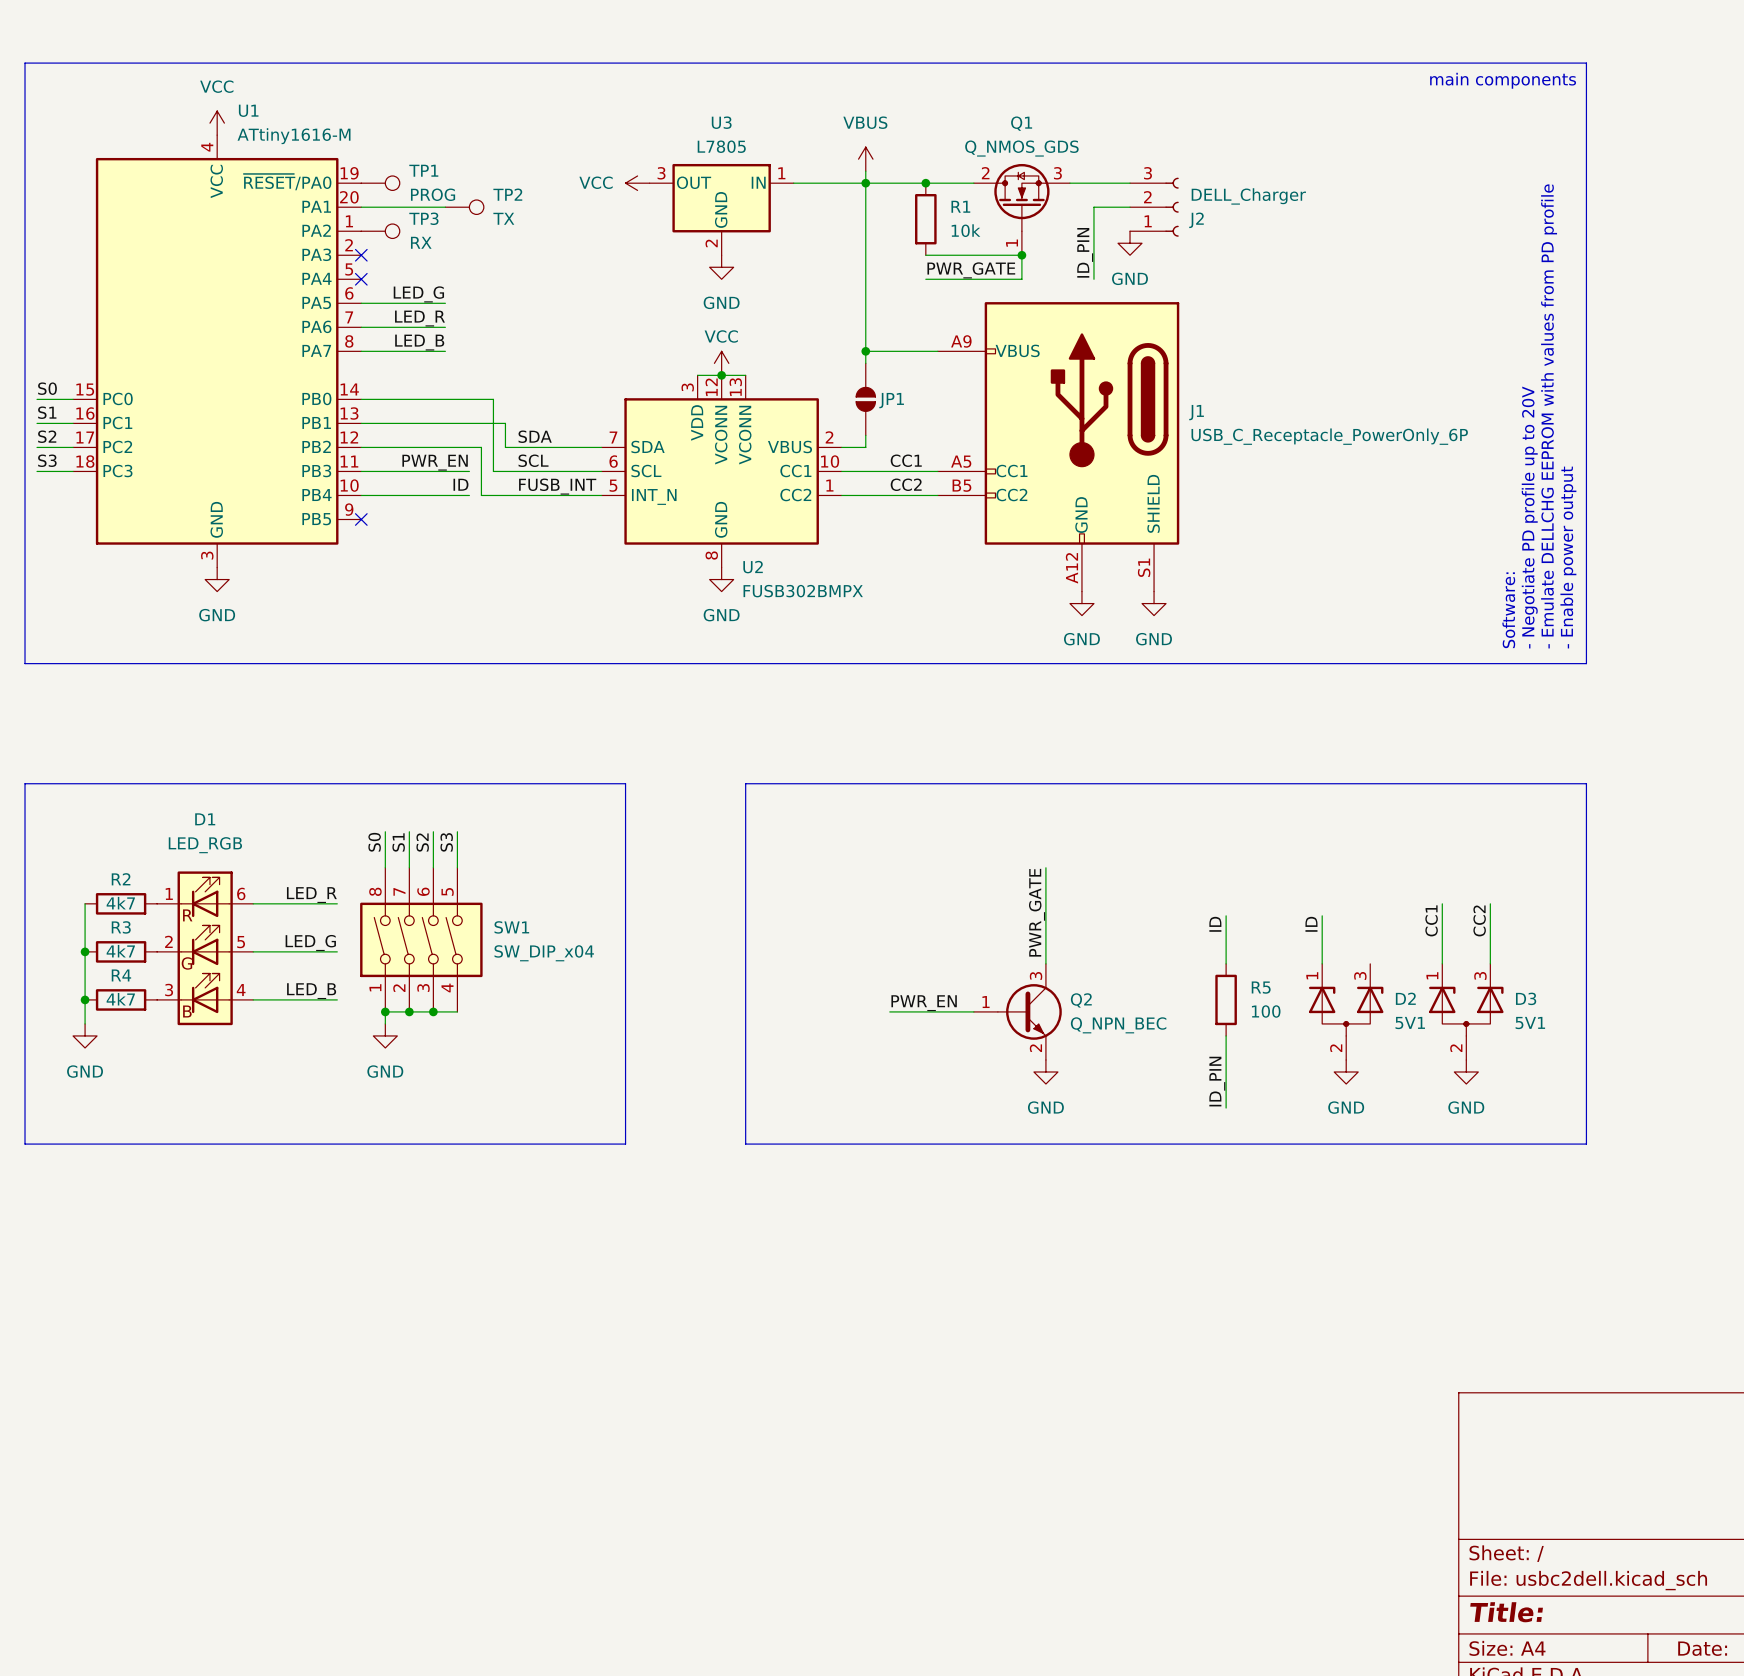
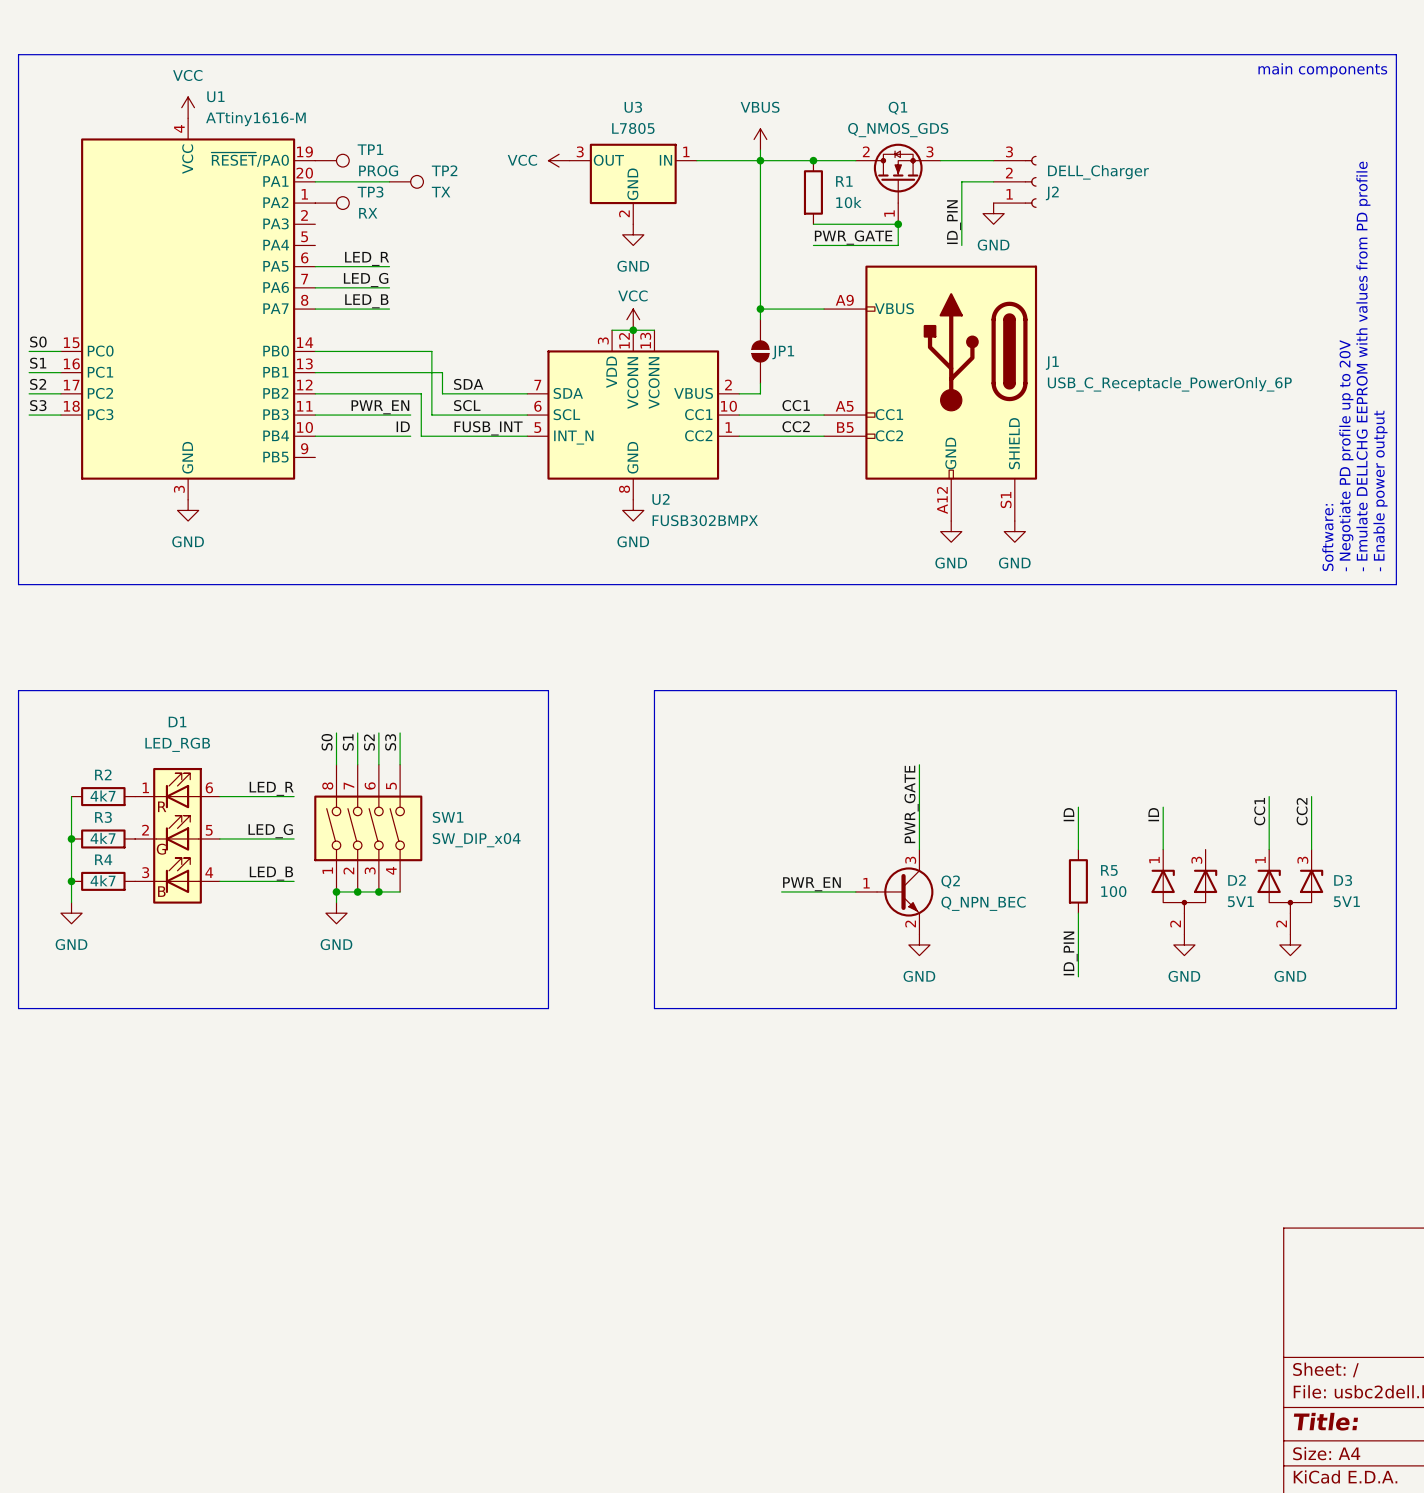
no-connect mark: (361, 255) -> none
no-connect mark: (361, 279) -> none
label: LED_G (418, 294) -> LED_R (367, 258)
label: LED_R (419, 318) -> LED_G (366, 280)
no-connect mark: (361, 519) -> none

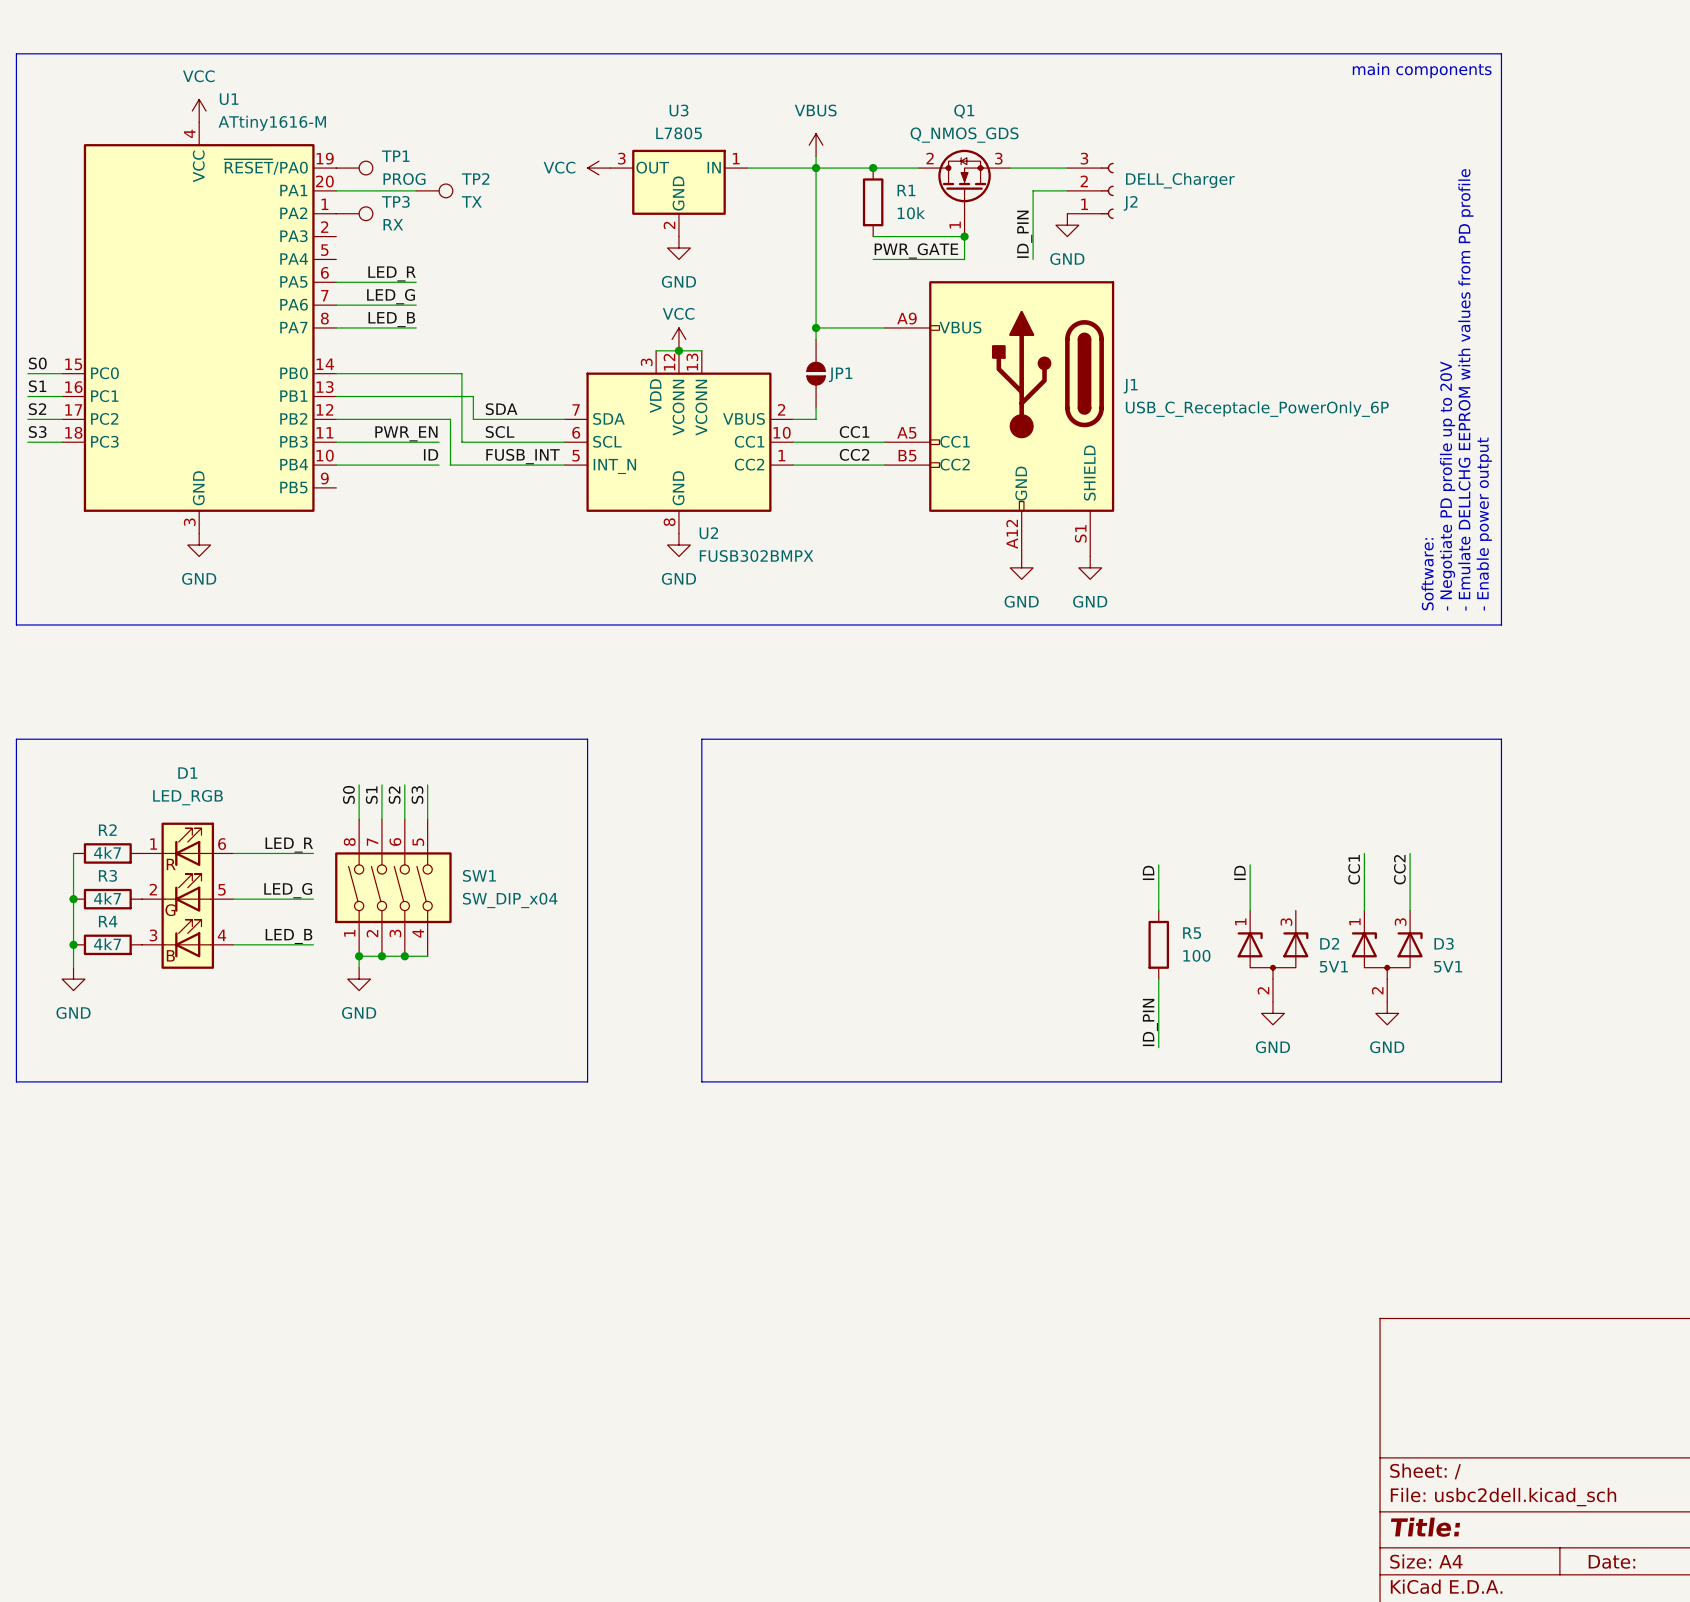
wire: (919, 764) (919, 849) -> none
label: PWR_GATE (911, 804) -> none
label: PWR_EN (811, 884) -> none
wire: (781, 891) (855, 891) -> none
Q2: Q_NPN_BEC (894, 891) -> none
power symbol: GND (919, 944) -> none

